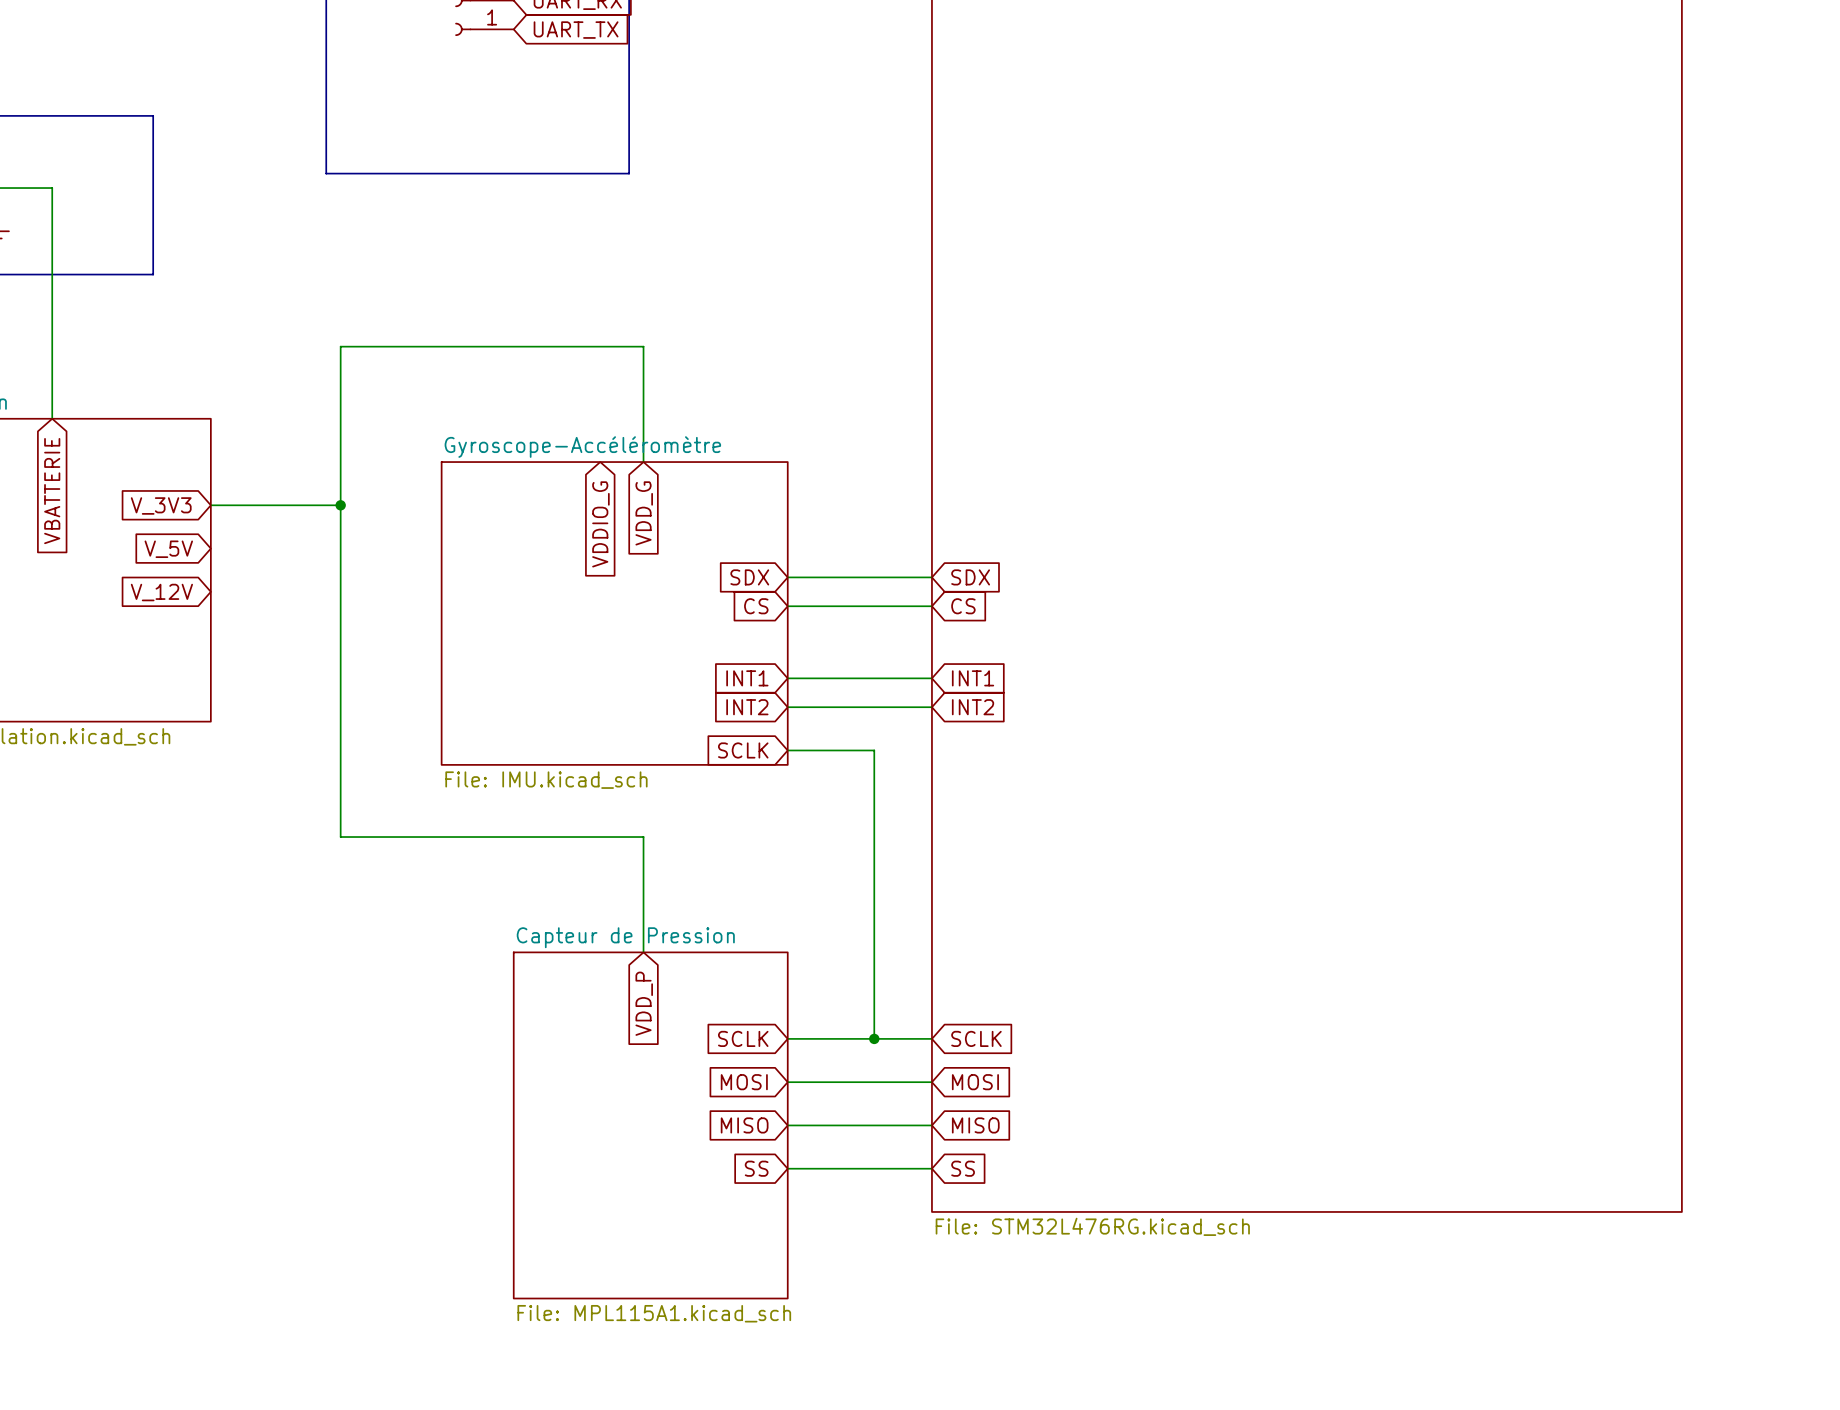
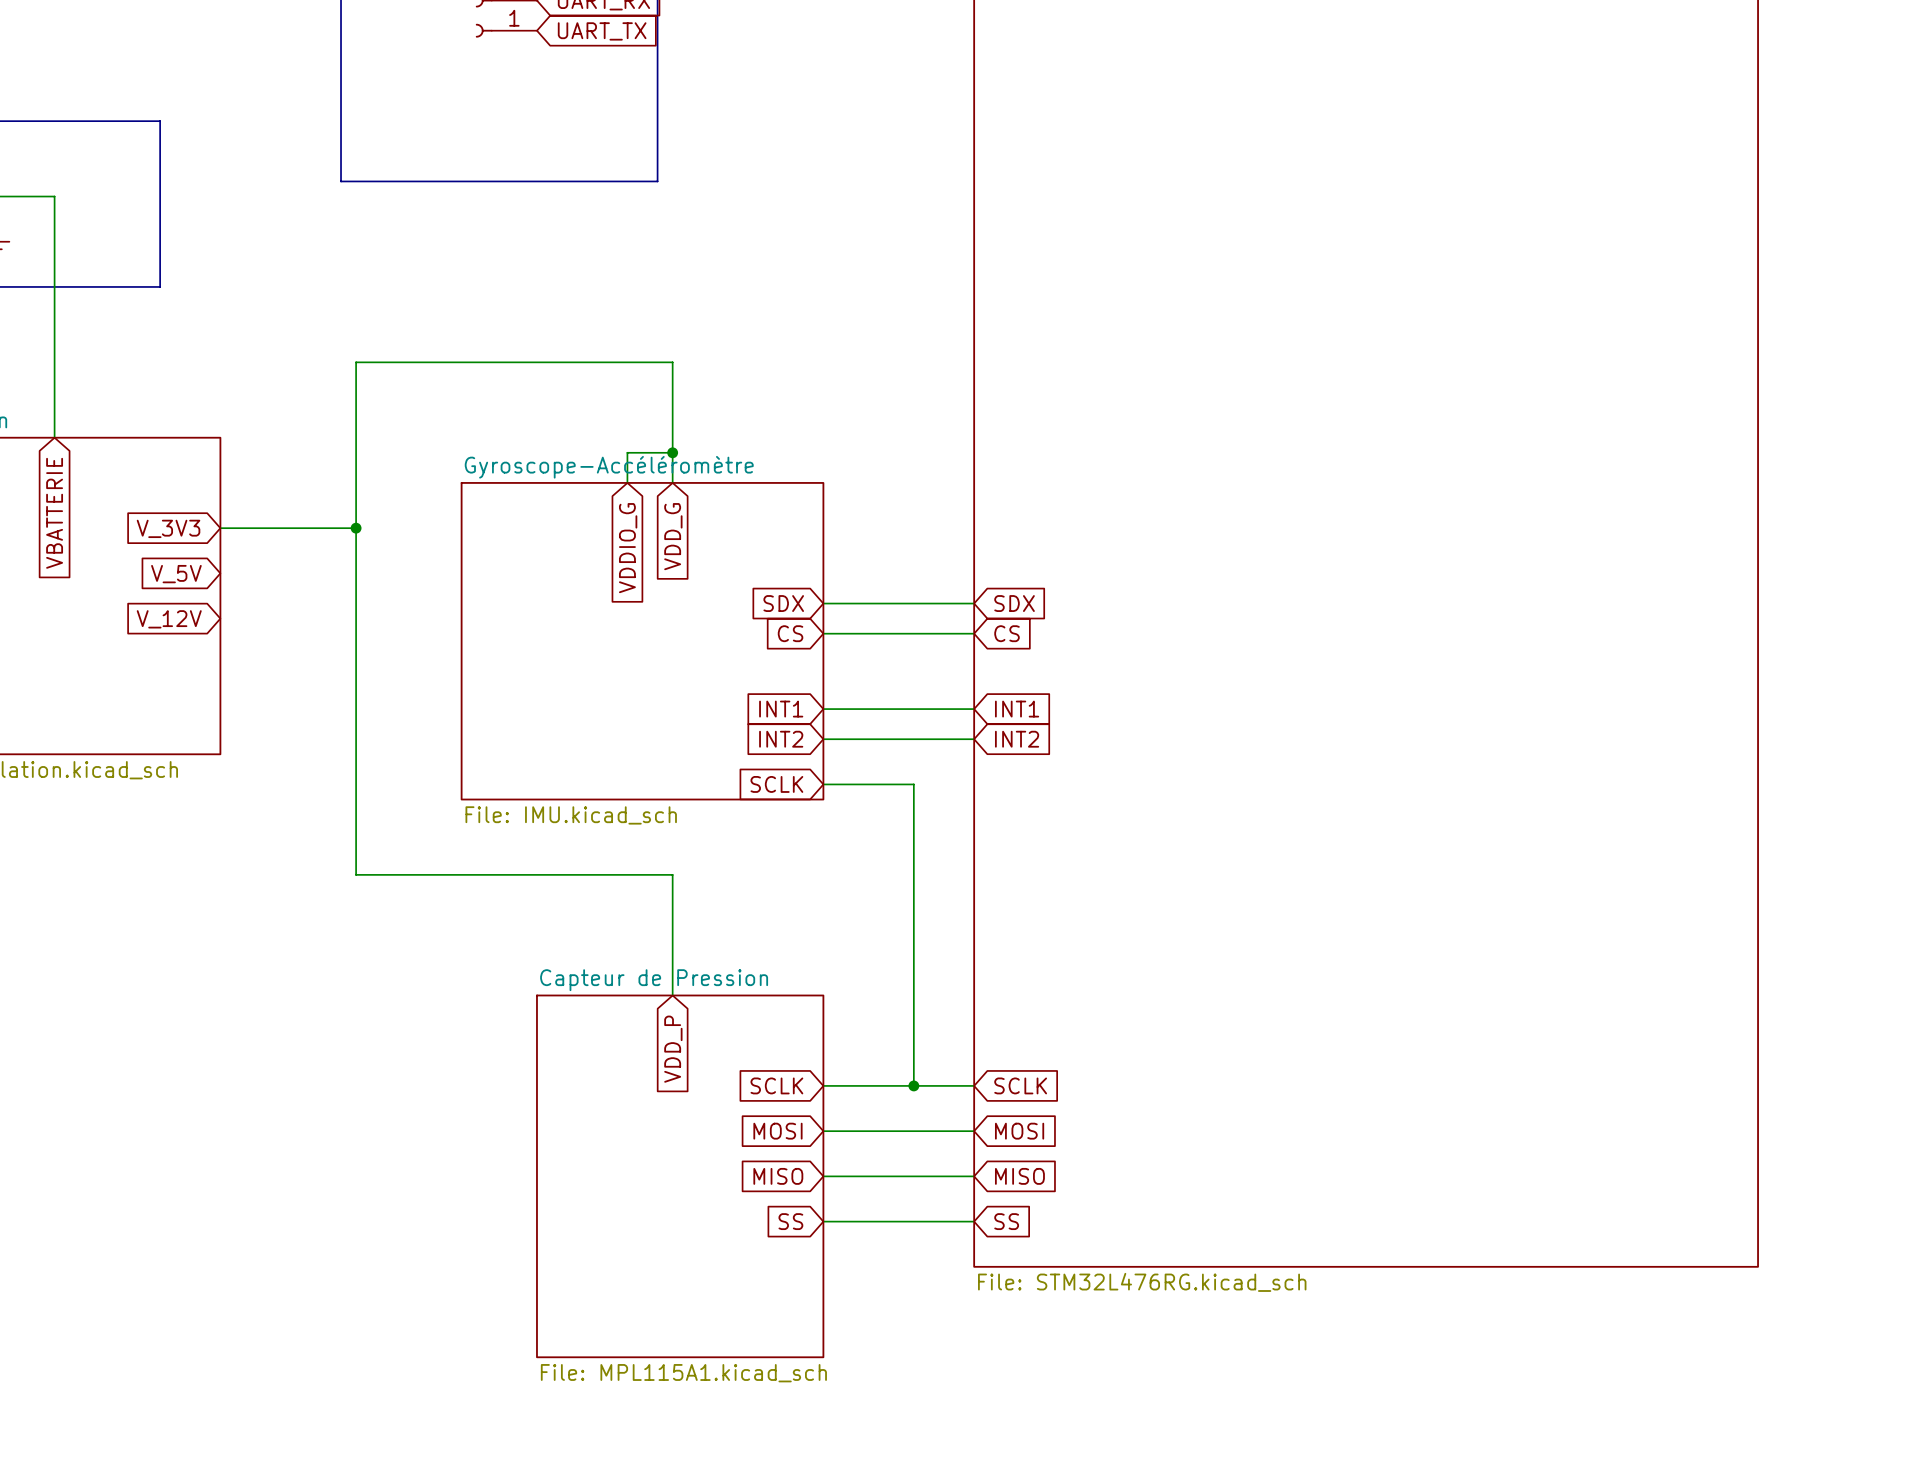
wire: none -> (672, 452) (627, 452) (627, 482)
junction: none -> (672, 452)

